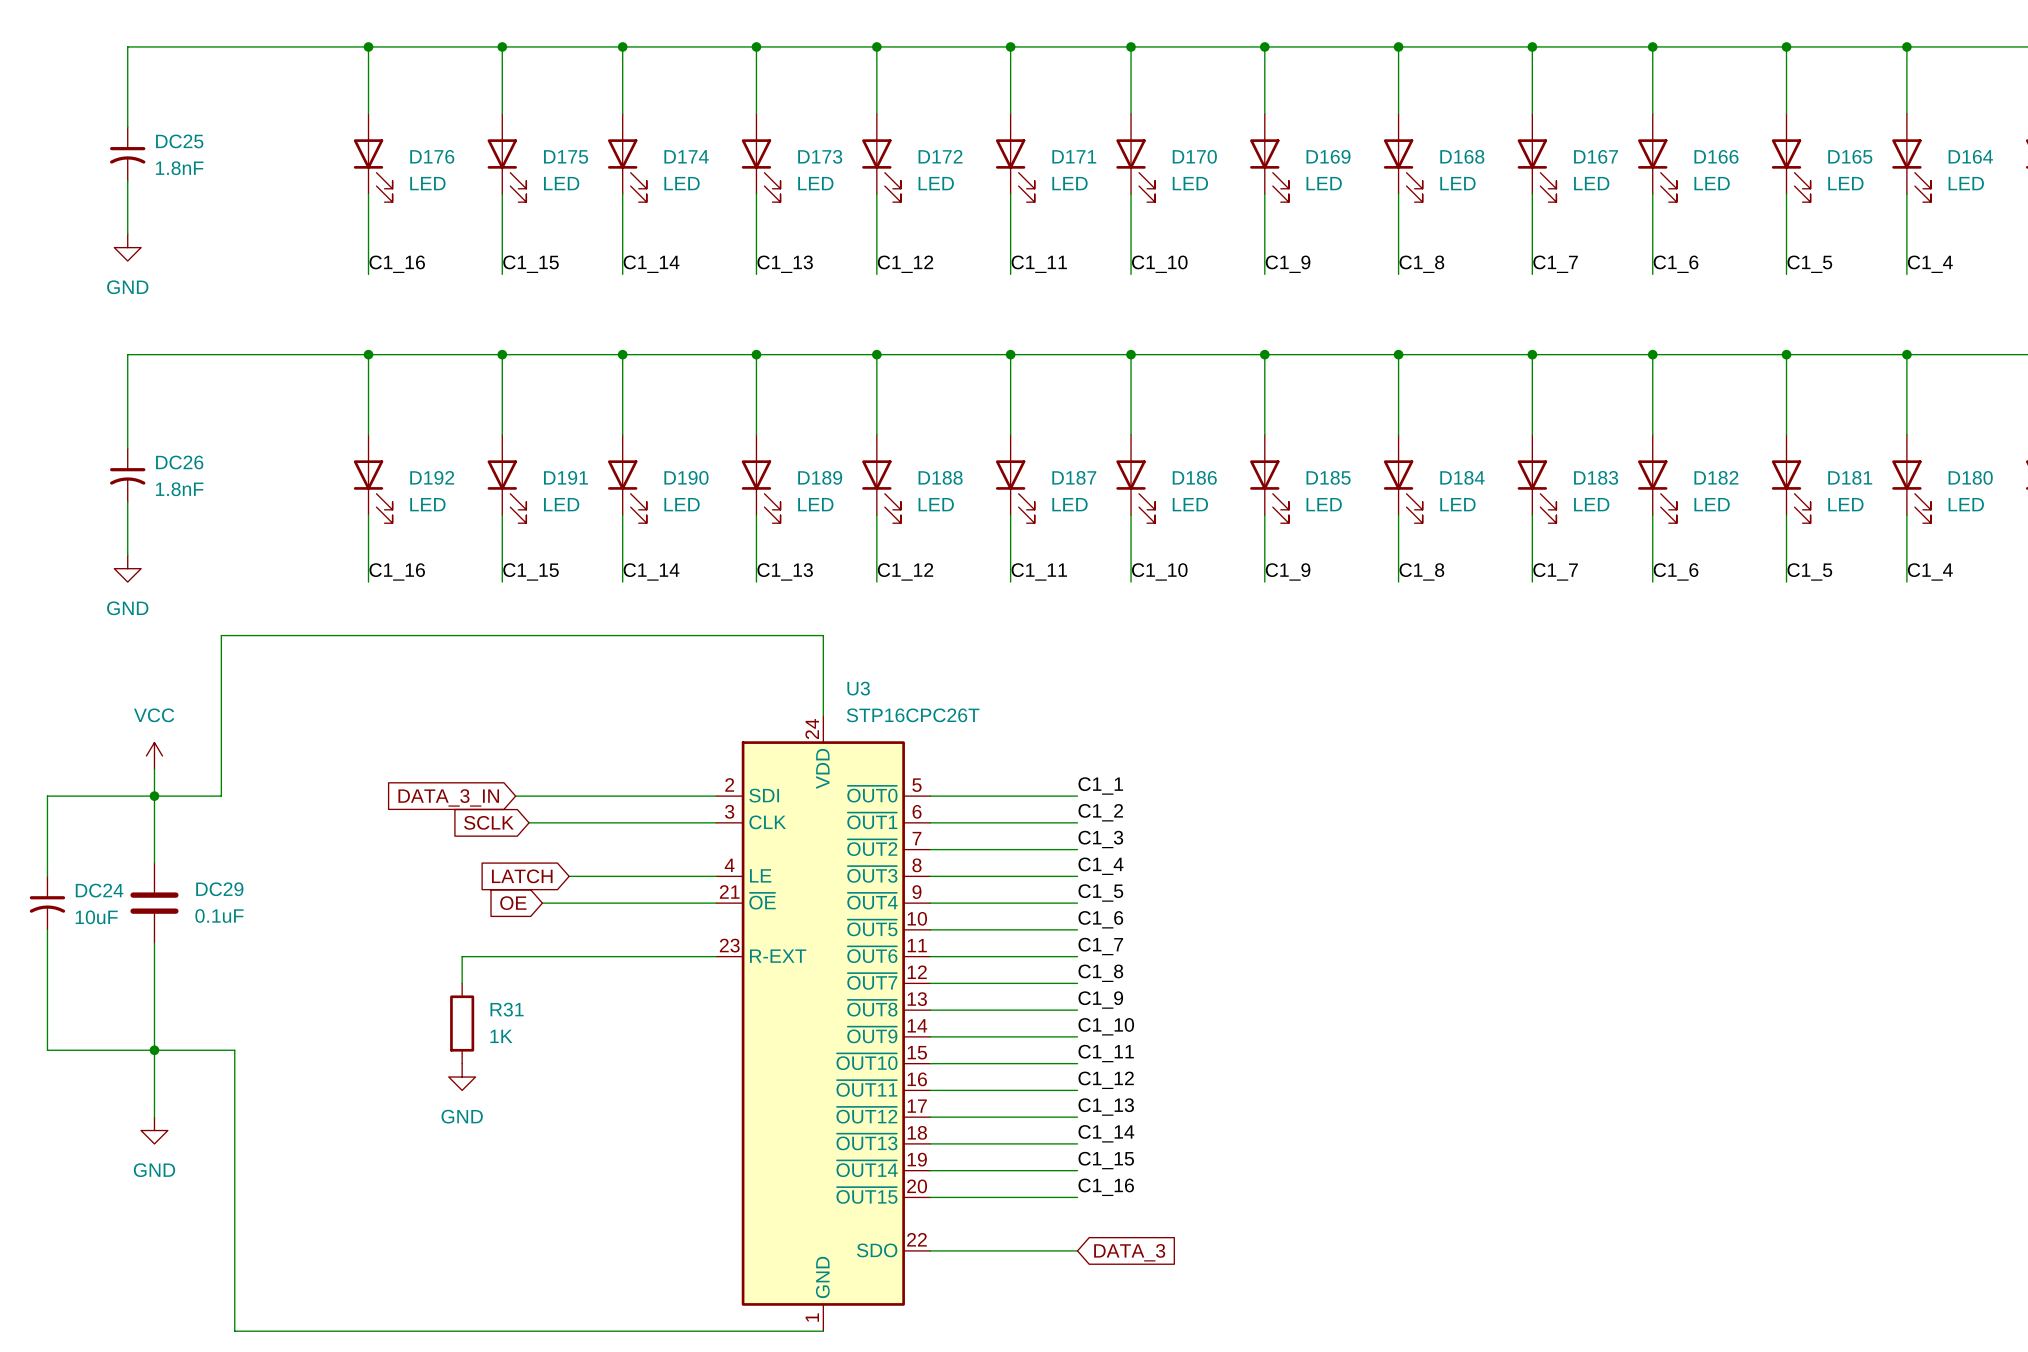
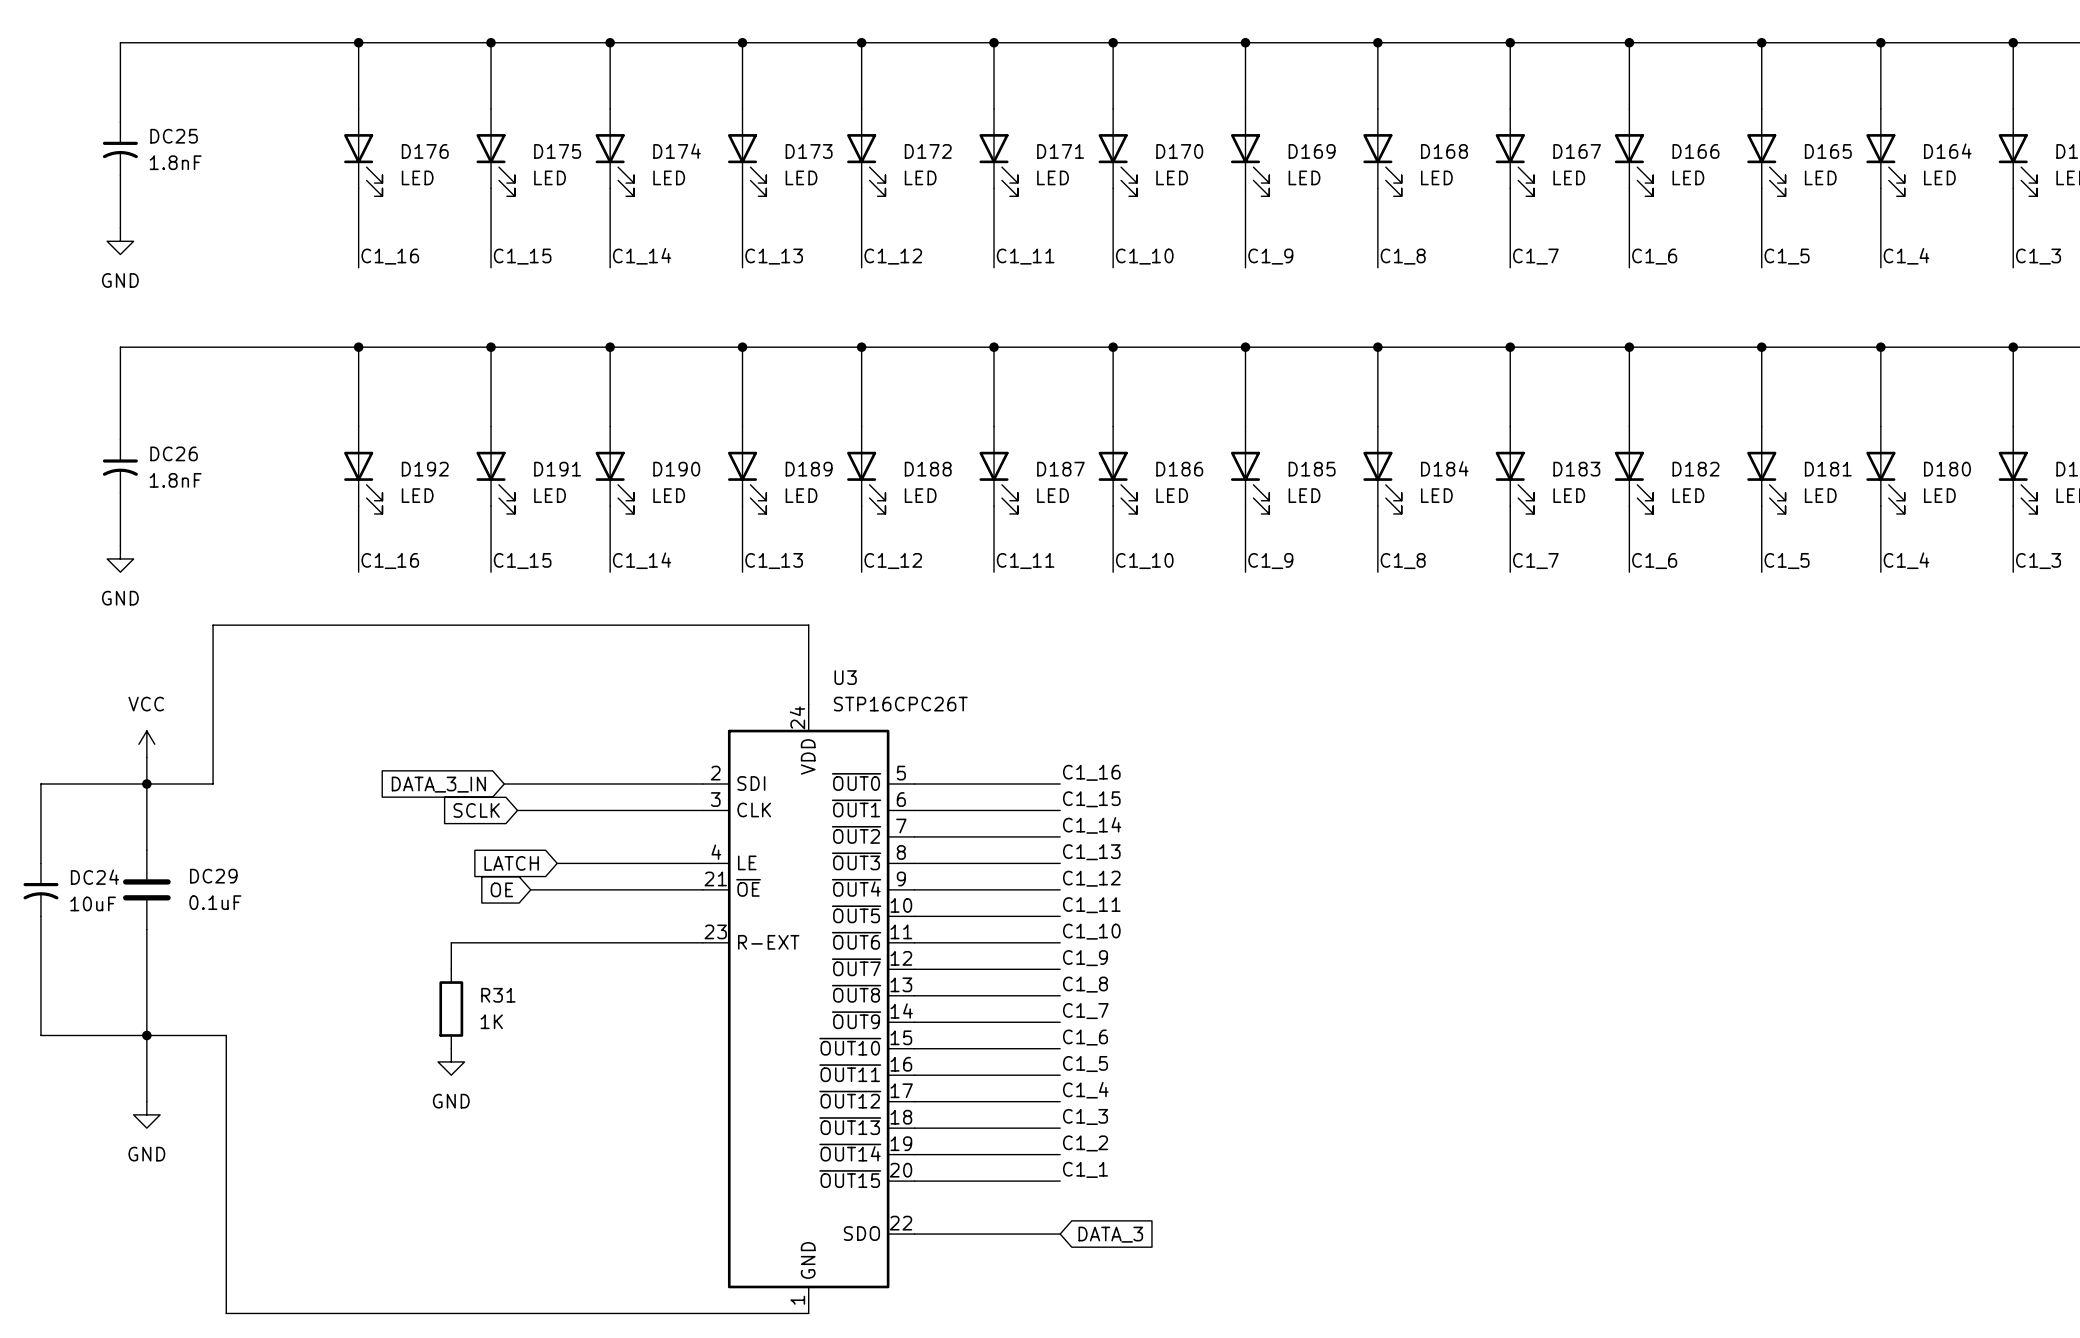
label: C1_1 (1100, 785) -> C1_16 (1091, 772)
label: C1_2 (1100, 812) -> C1_15 (1091, 799)
label: C1_3 (1100, 839) -> C1_14 (1092, 825)
label: C1_4 (1100, 866) -> C1_13 (1091, 852)
label: C1_5 (1100, 893) -> C1_12 (1091, 878)
label: C1_6 (1100, 919) -> C1_11 (1091, 905)
label: C1_7 (1100, 946) -> C1_10 (1091, 931)
label: C1_8 (1100, 973) -> C1_9 (1085, 958)
label: C1_9 (1100, 1000) -> C1_8 (1085, 984)
label: C1_10 (1106, 1026) -> C1_7 (1085, 1011)
label: C1_11 (1106, 1053) -> C1_6 (1085, 1037)
label: C1_12 (1106, 1080) -> C1_5 (1085, 1064)
label: C1_13 (1106, 1107) -> C1_4 (1085, 1090)
label: C1_14 (1106, 1133) -> C1_3 (1085, 1116)
label: C1_15 (1106, 1160) -> C1_2 (1085, 1143)
label: C1_16 (1106, 1187) -> C1_1 (1085, 1169)

